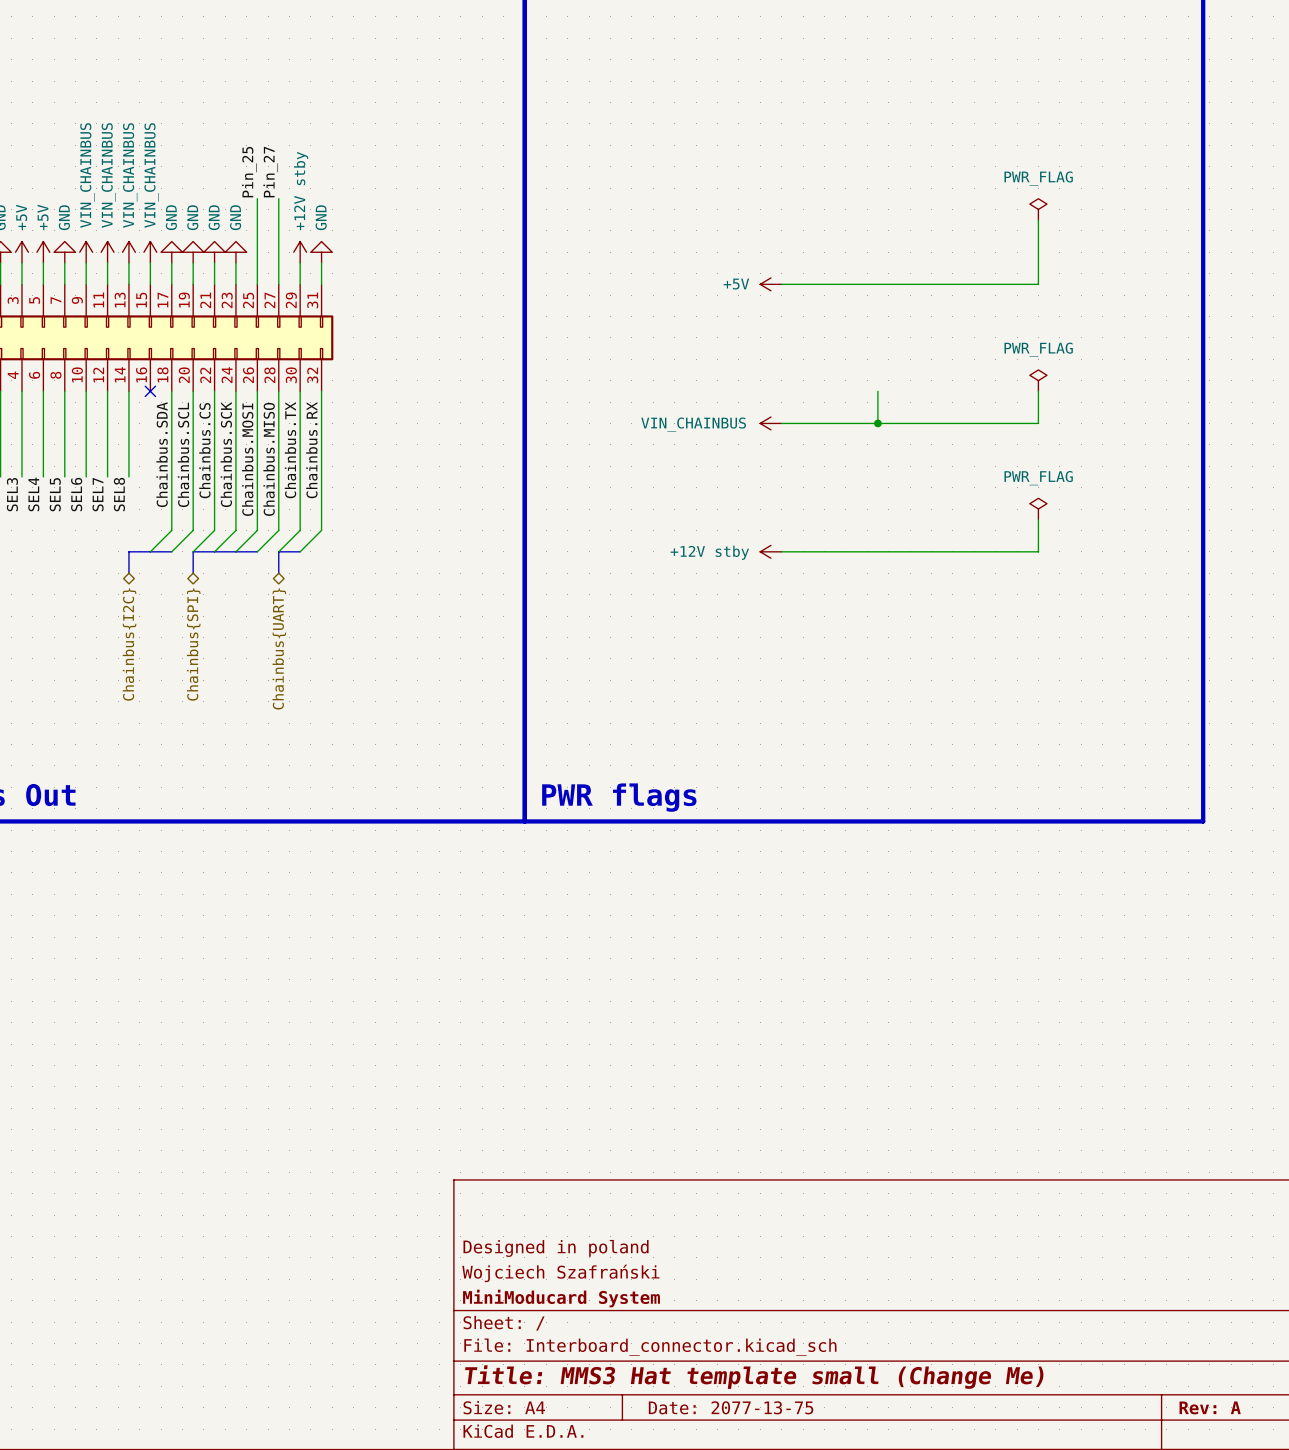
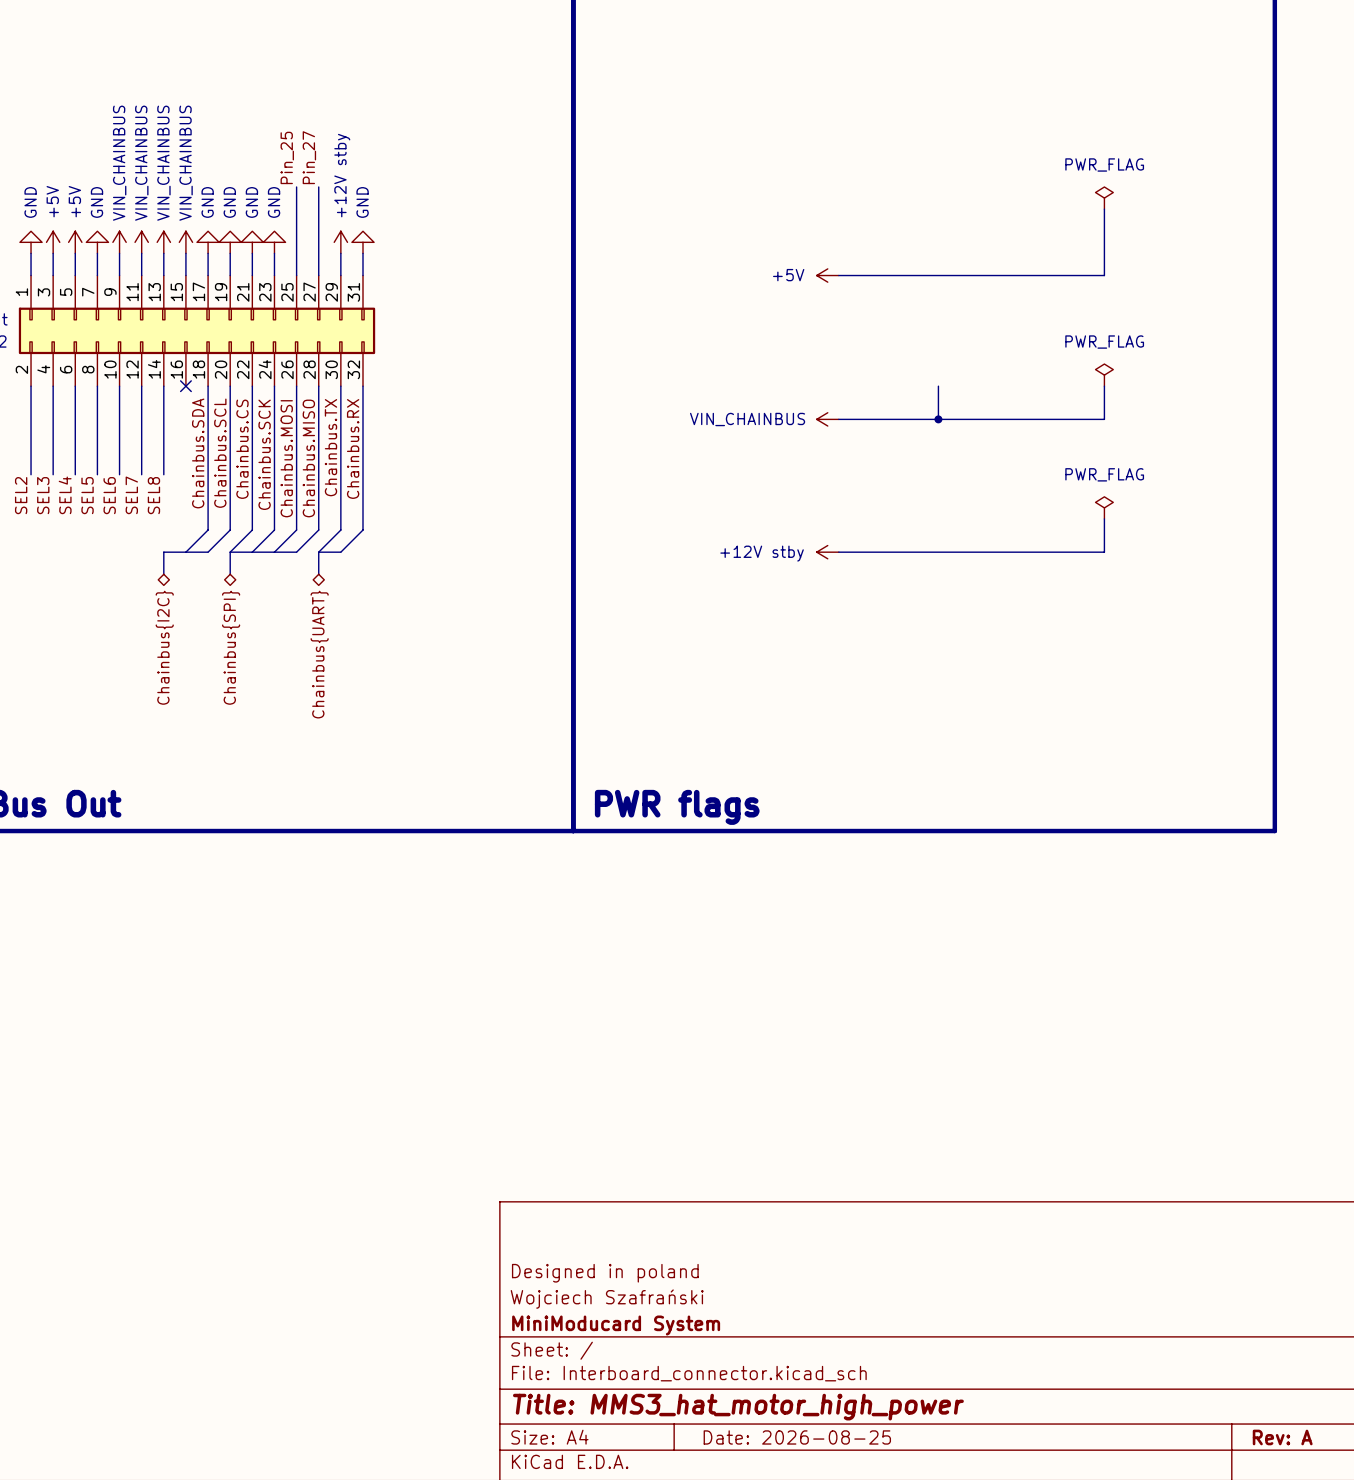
title block: Title: MMS3 Hat template small (Change Me) (754, 1377) -> Title: MMS3_hat_motor_high_power (738, 1407)
title block: Date: 2077-13-75 (731, 1407) -> Date: 2026-08-25 (797, 1437)

